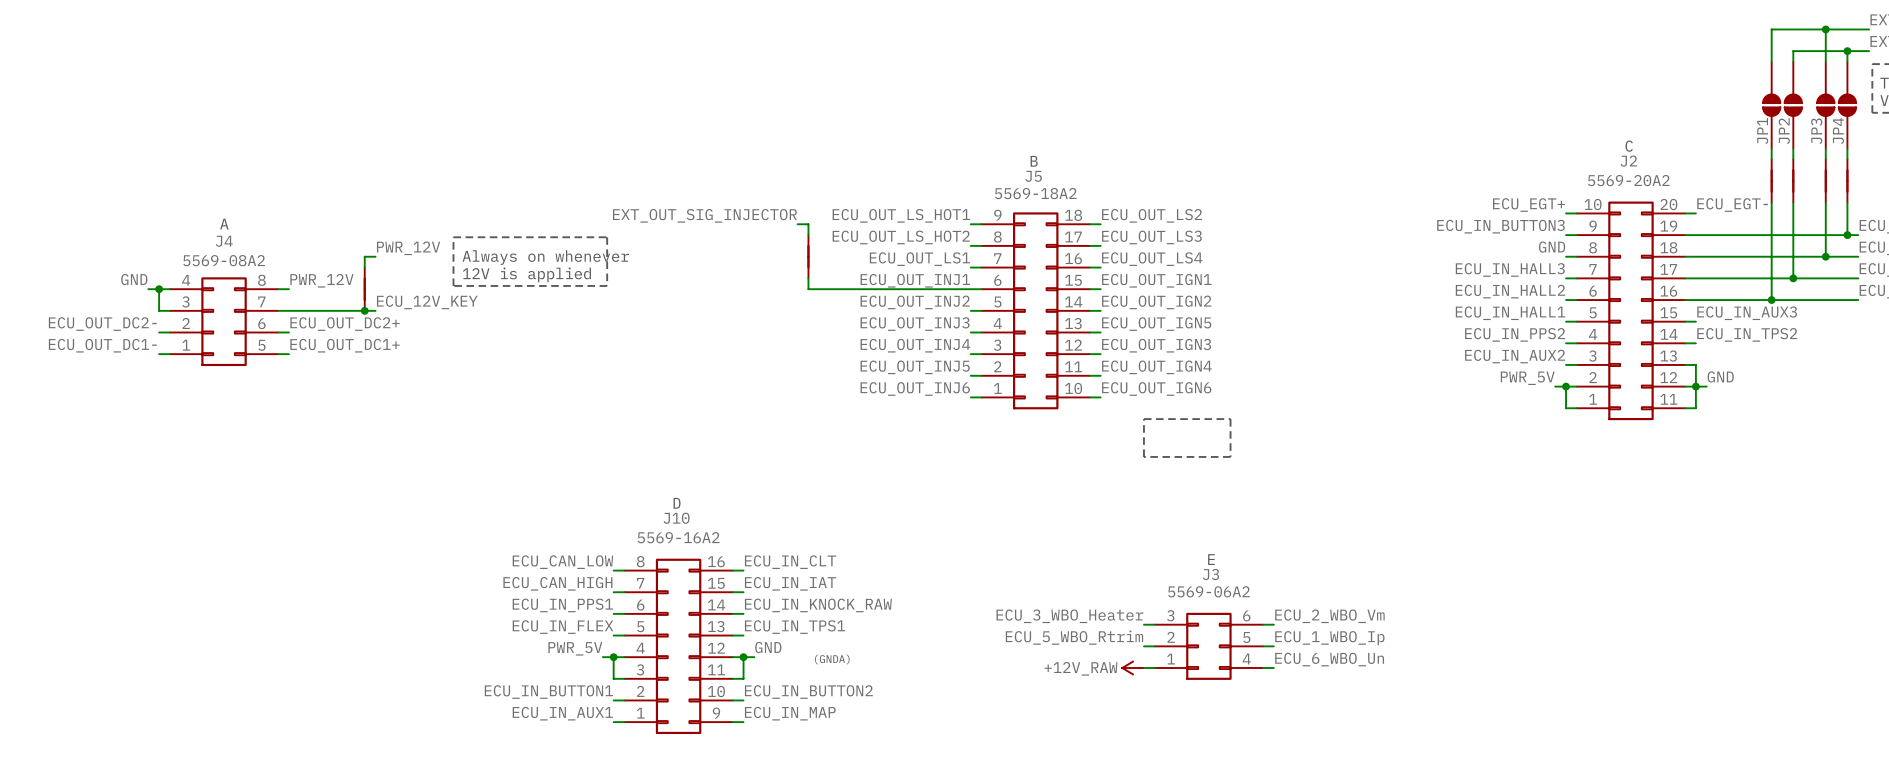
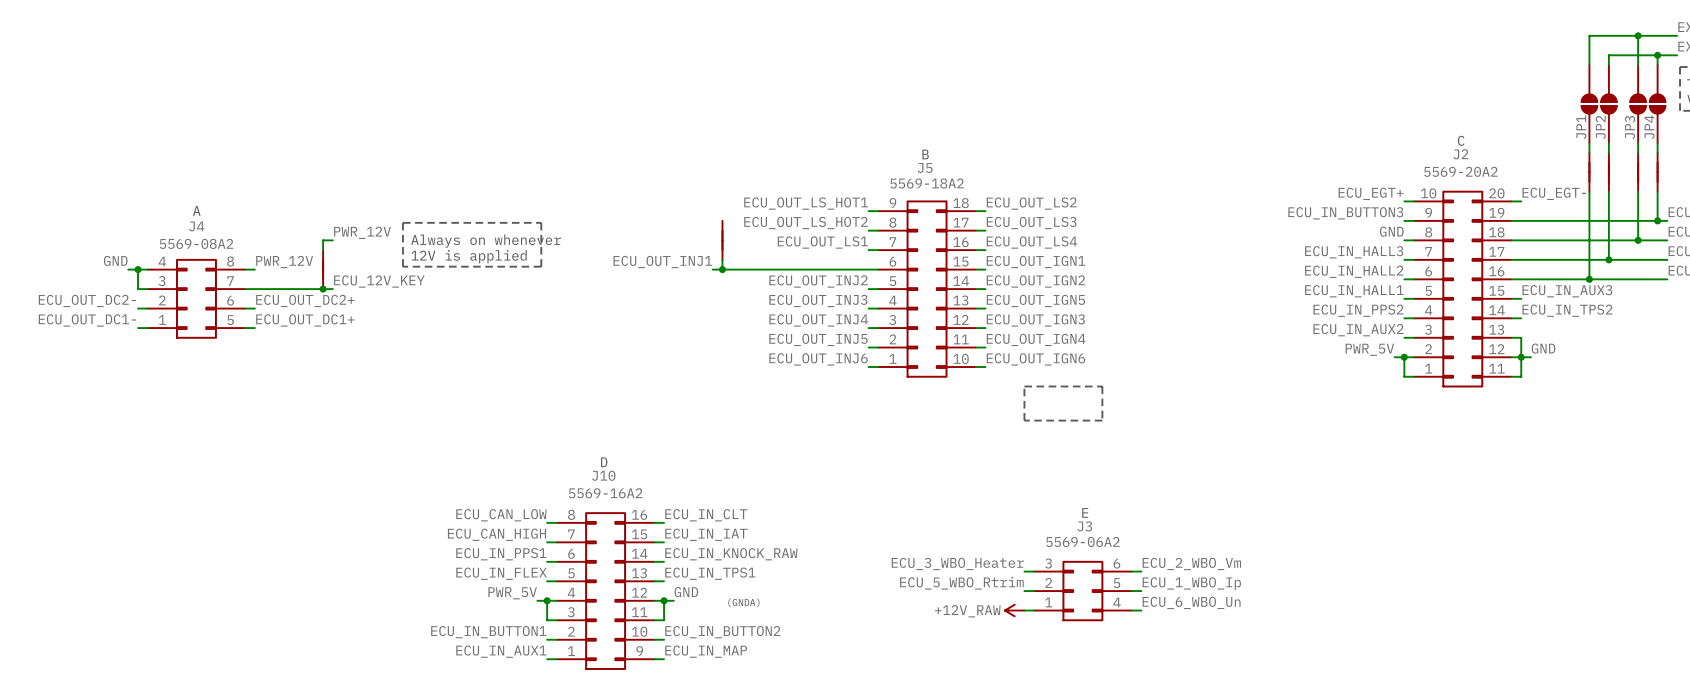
label: EXT_OUT_SIG_INJECTOR (704, 215) -> none
wire: (797, 224) (808, 224) (808, 235) -> none
label position: ECU_OUT_INJ1 (915, 280) -> ECU_OUT_INJ1 (662, 262)
wire: none -> (712, 269) (722, 269)
junction: none -> (722, 269)

